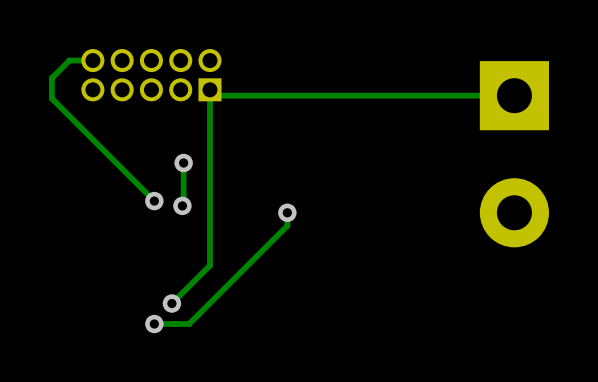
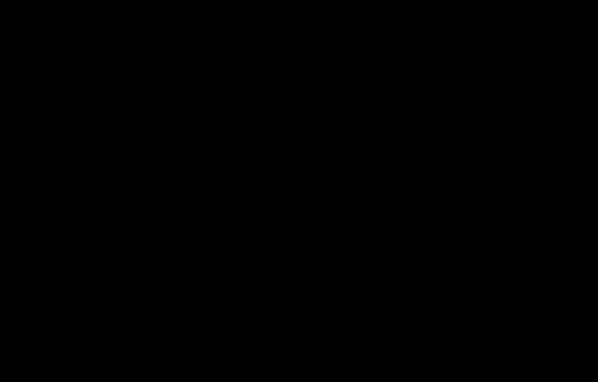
track: (92, 60) (69, 60) (51, 78) (51, 98) (154, 201) -> none
part: (151, 75) -> none
track: (514, 95) (215, 95) (209, 89) (209, 265) (171, 303) -> none
part: (514, 154) -> none
track: (183, 163) (182, 205) -> none
via: (183, 163) -> none
via: (154, 201) -> none
via: (182, 205) -> none
track: (287, 212) (287, 225) (189, 324) (154, 324) -> none
via: (287, 212) -> none
via: (171, 303) -> none
via: (154, 324) -> none

